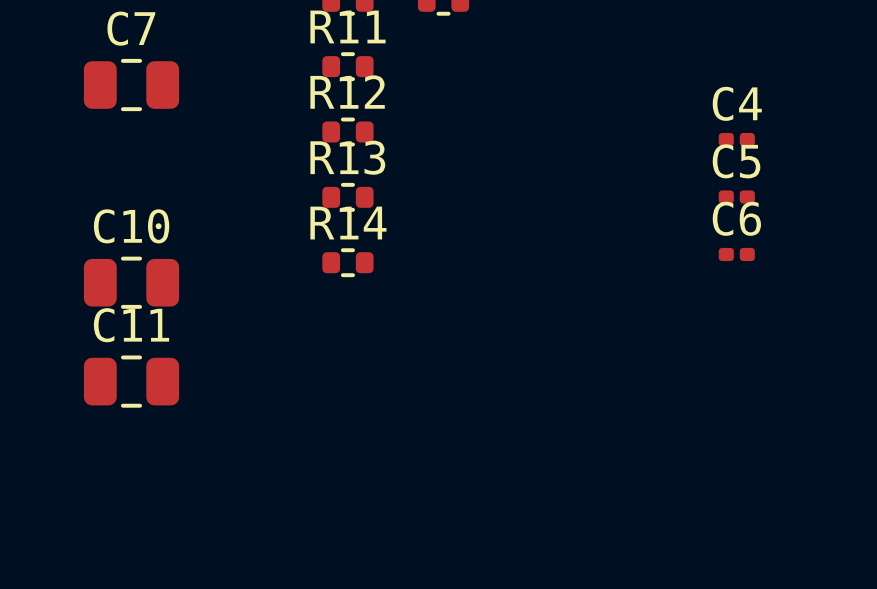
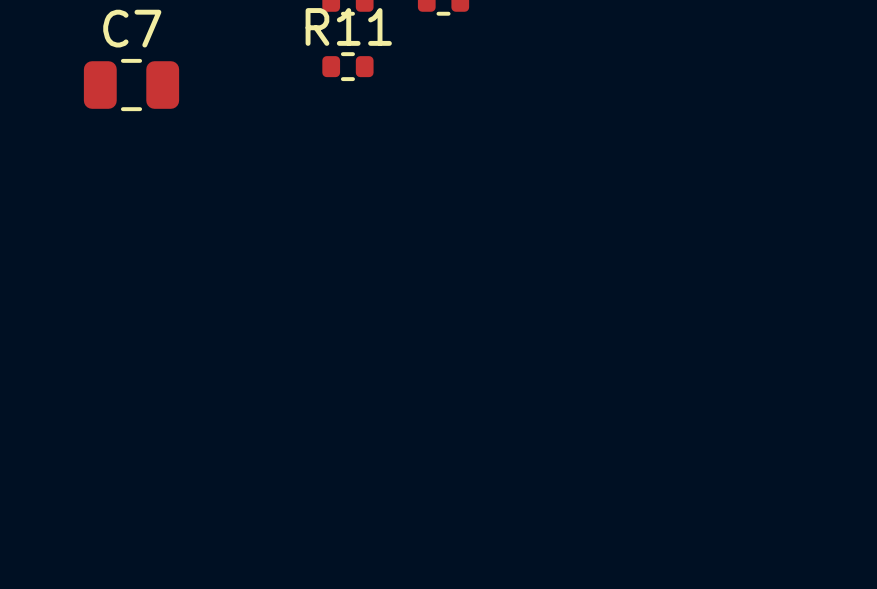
R12: (347, 131) -> none
C4: (736, 139) -> none
R13: (347, 197) -> none
C5: (736, 197) -> none
C6: (736, 254) -> none
R14: (347, 262) -> none
C10: (131, 282) -> none
C11: (131, 381) -> none

